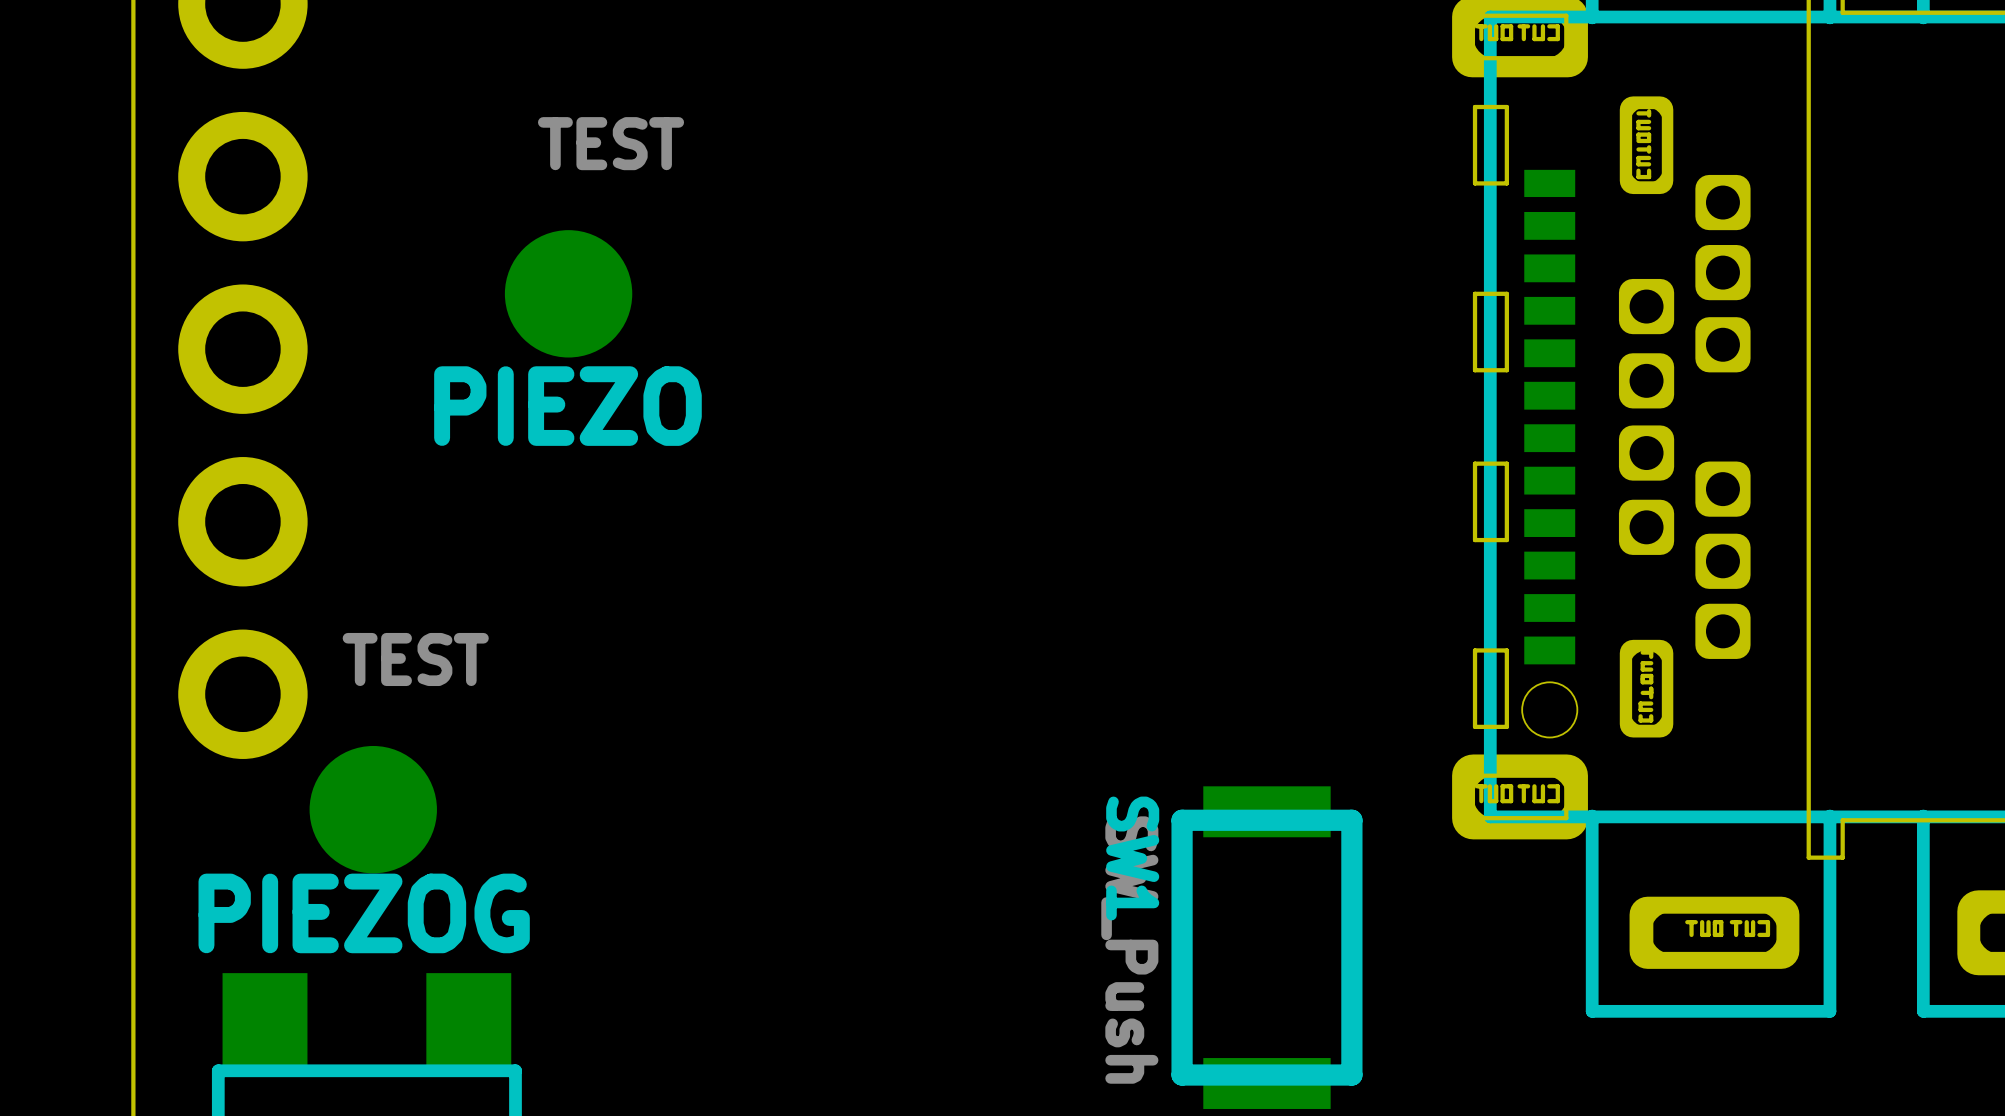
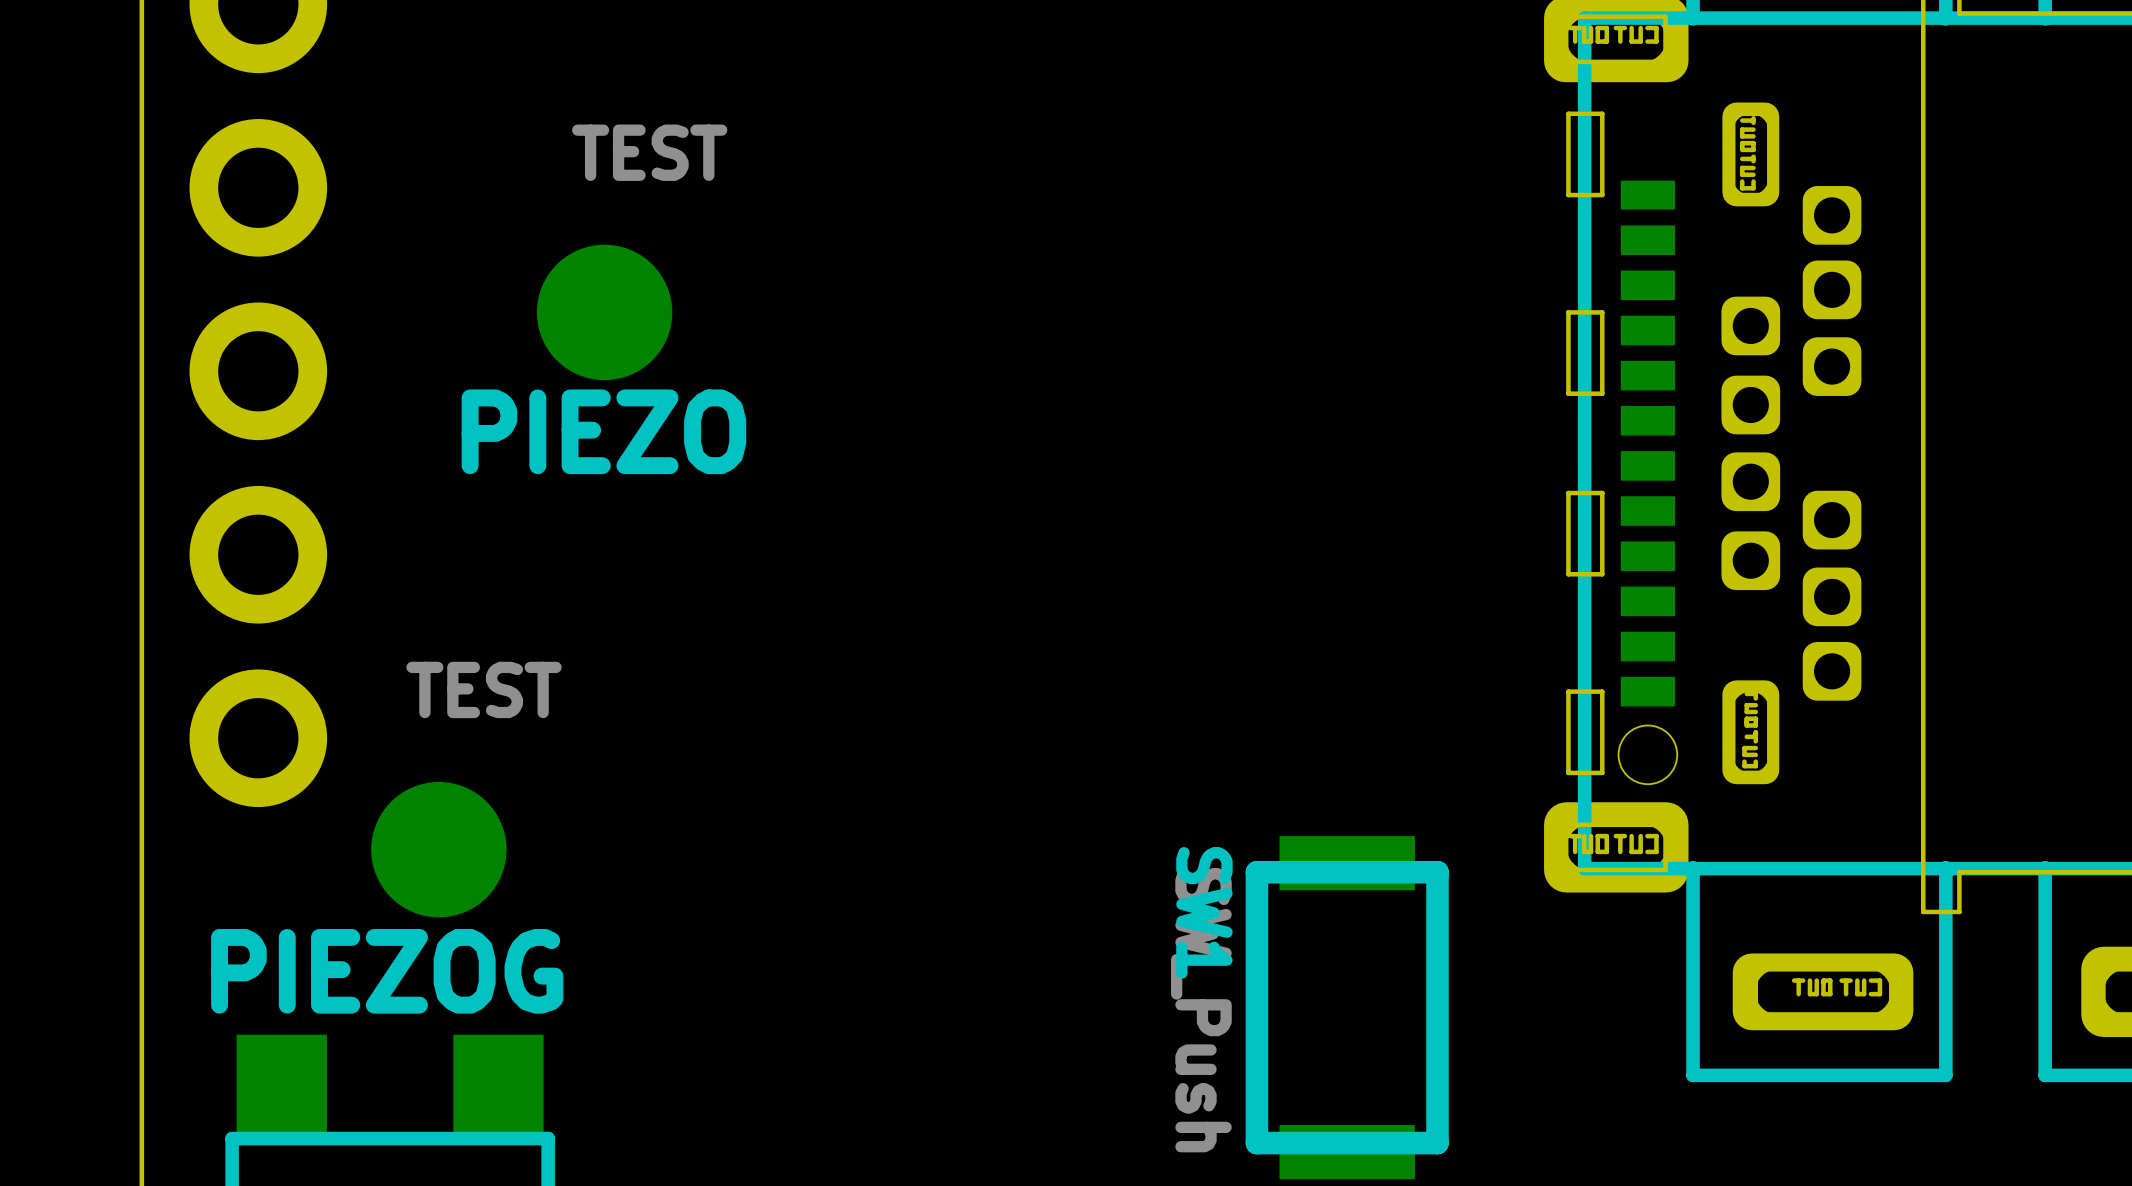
part position: (373, 809) -> (438, 849)

